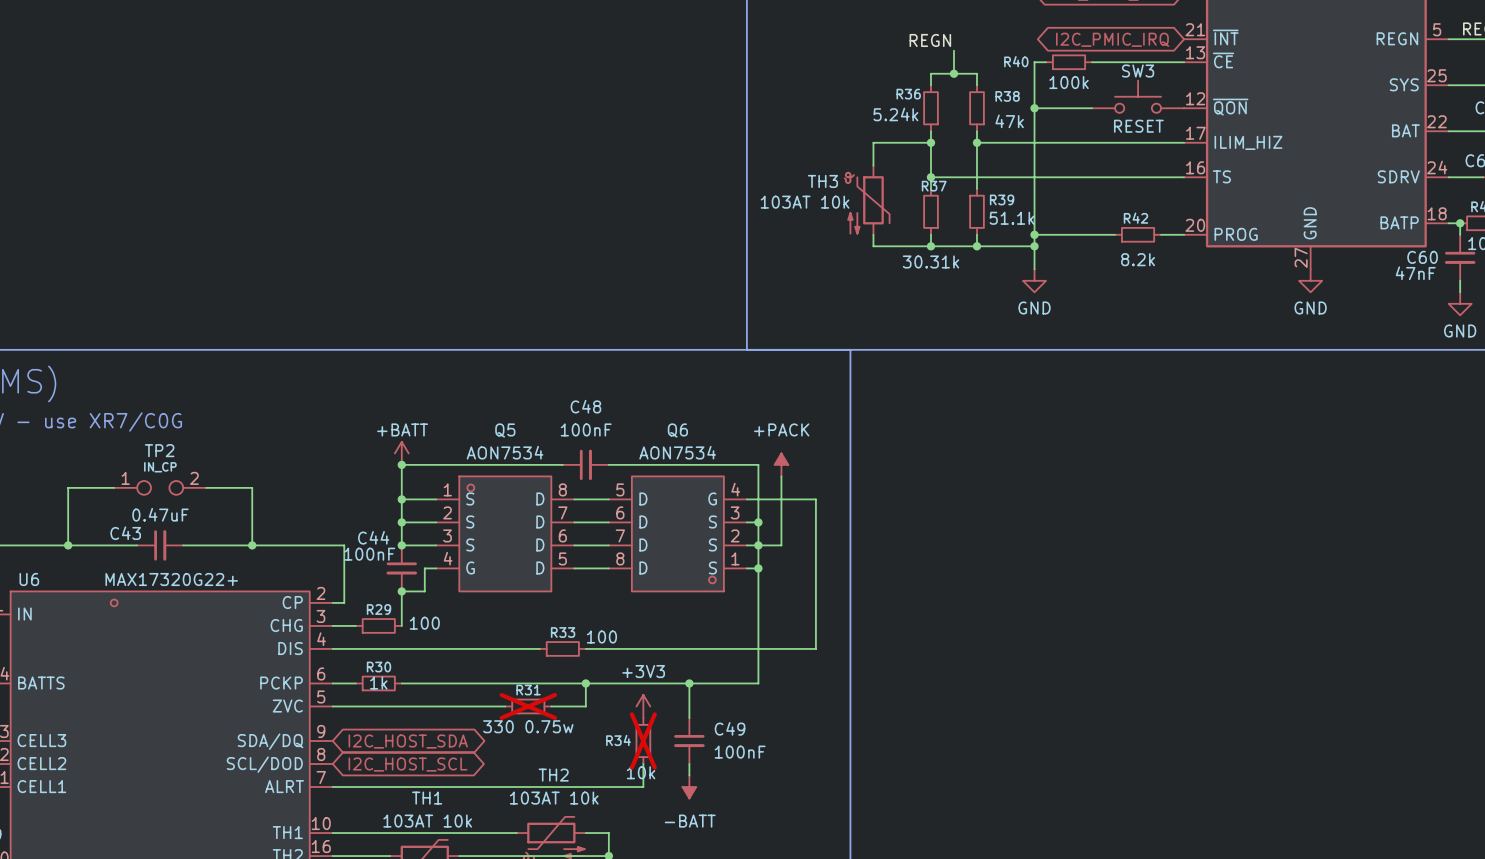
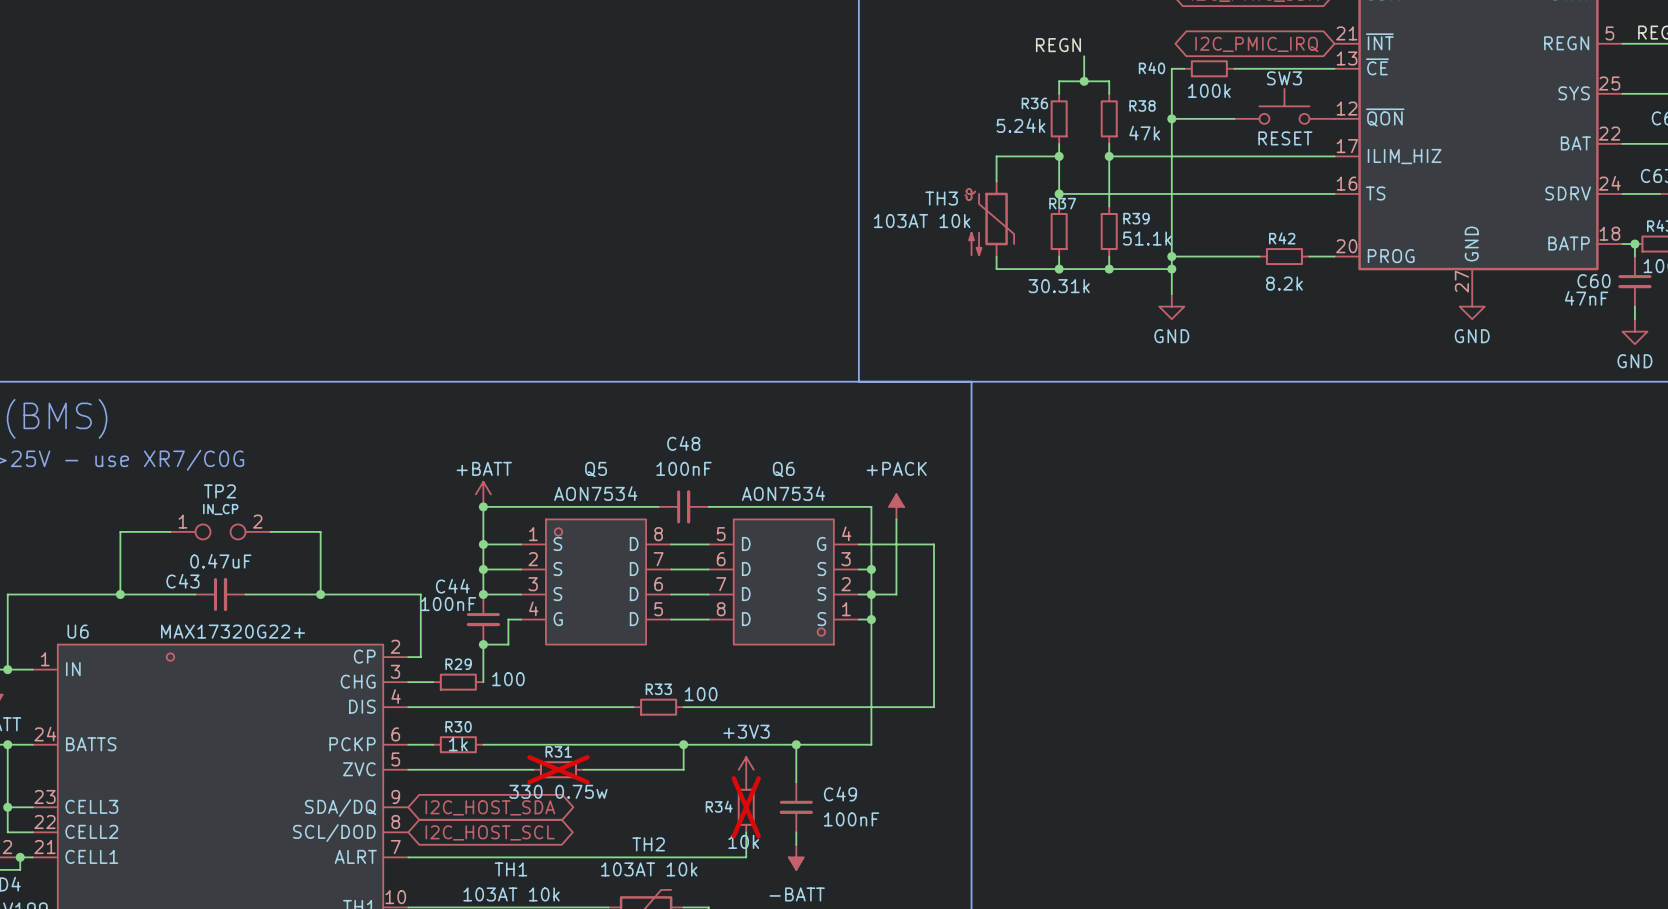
R31 position: (528, 706) -> (558, 769)

